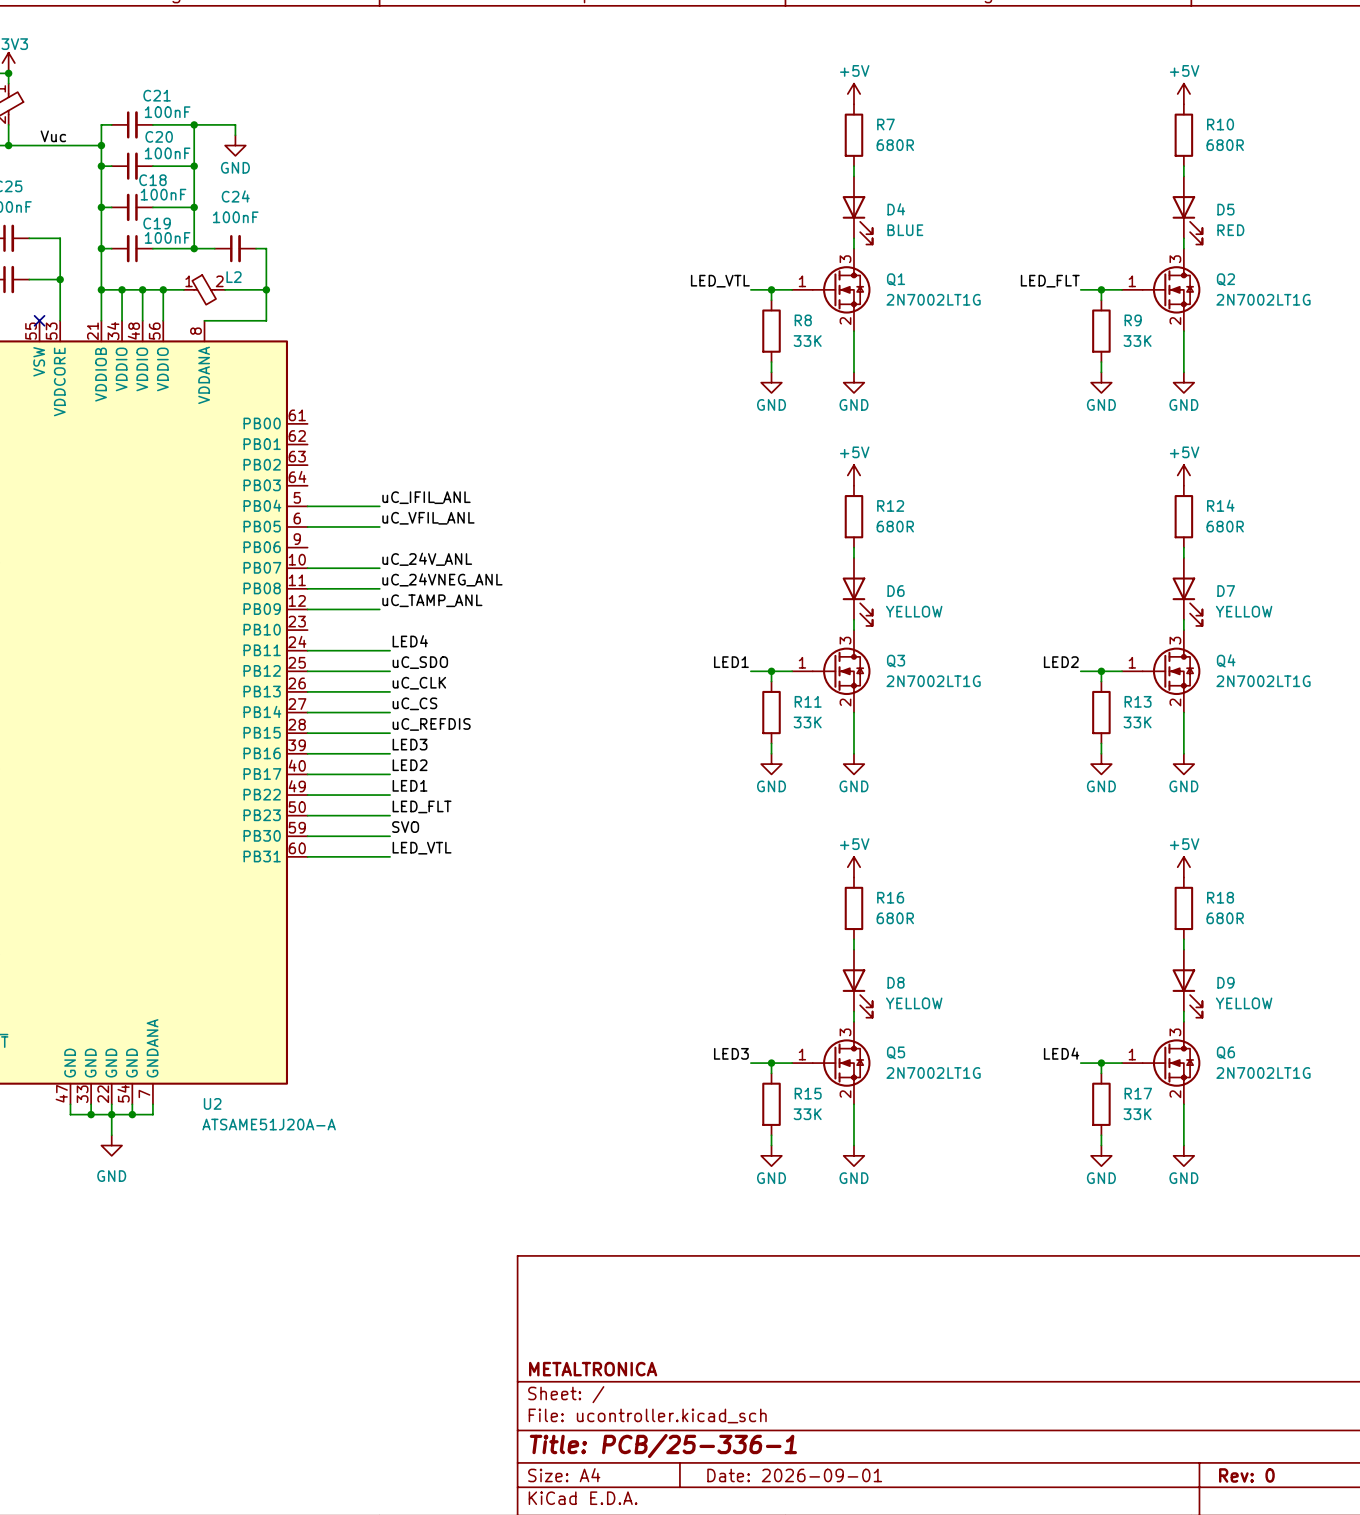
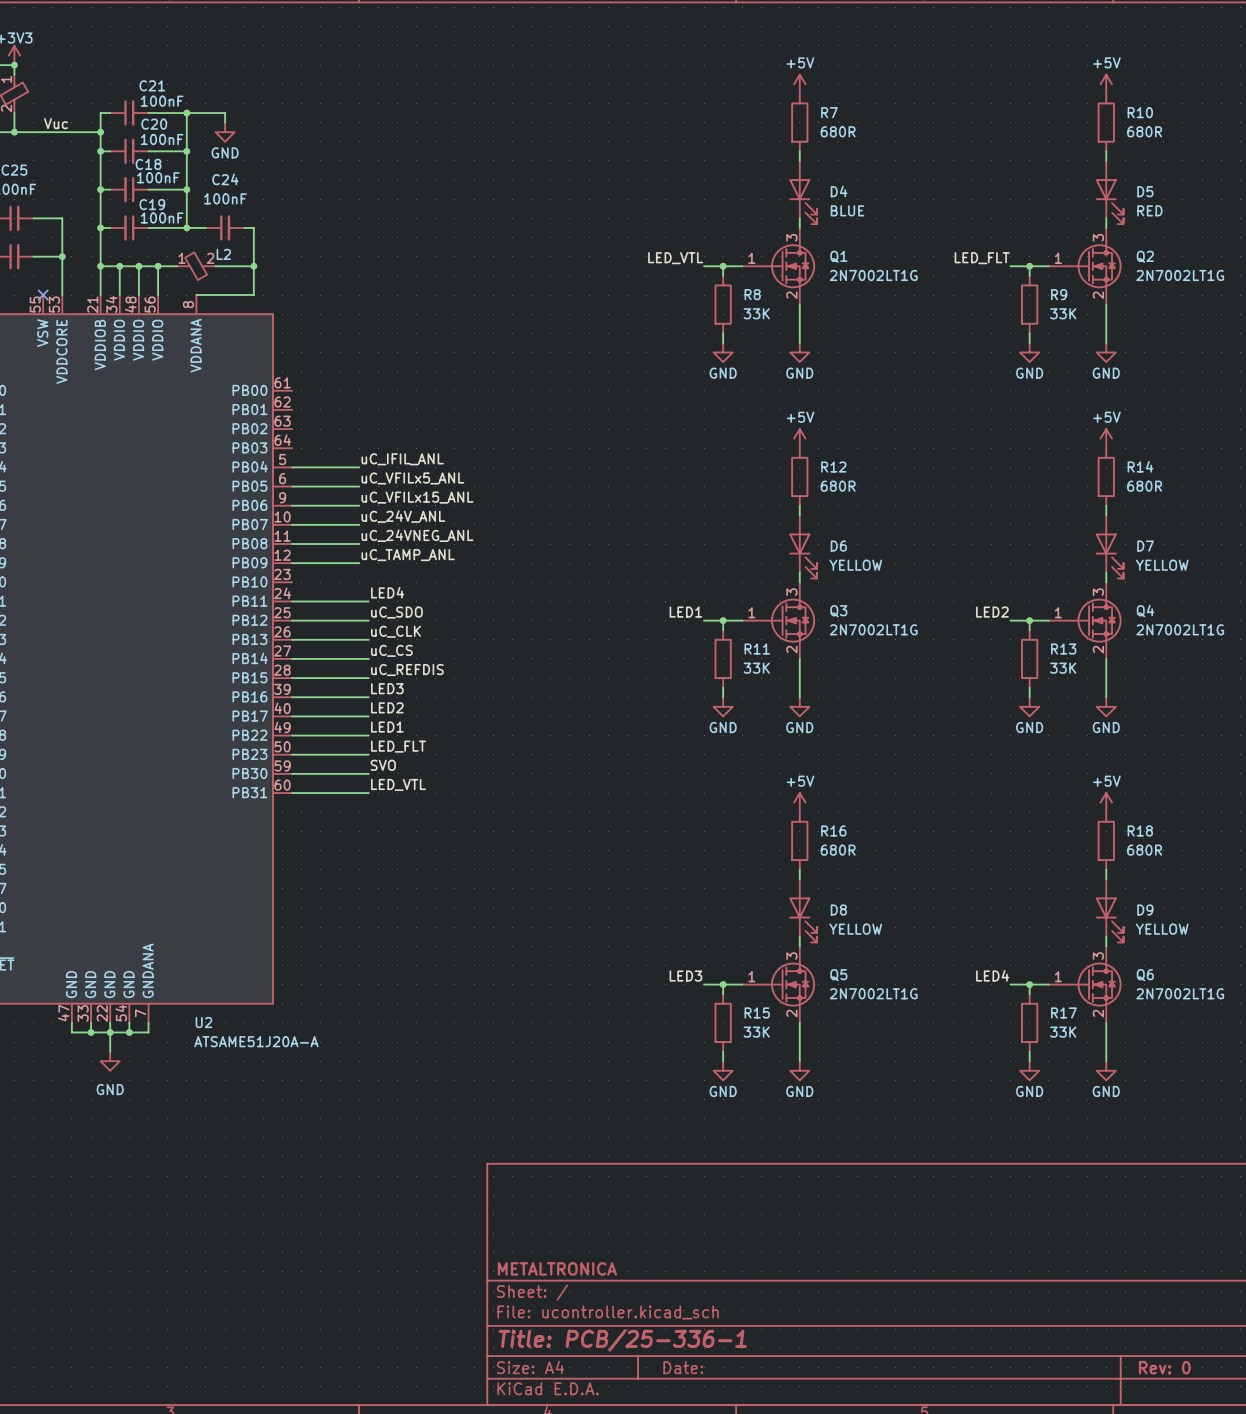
label: uC_VFIL_ANL (428, 518) -> uC_VFILx5_ANL (412, 478)
label: none -> uC_VFILx15_ANL (417, 497)
wire: none -> (292, 505) (359, 505)
title block: Date: 2026-09-01 (794, 1475) -> Date: (683, 1367)

